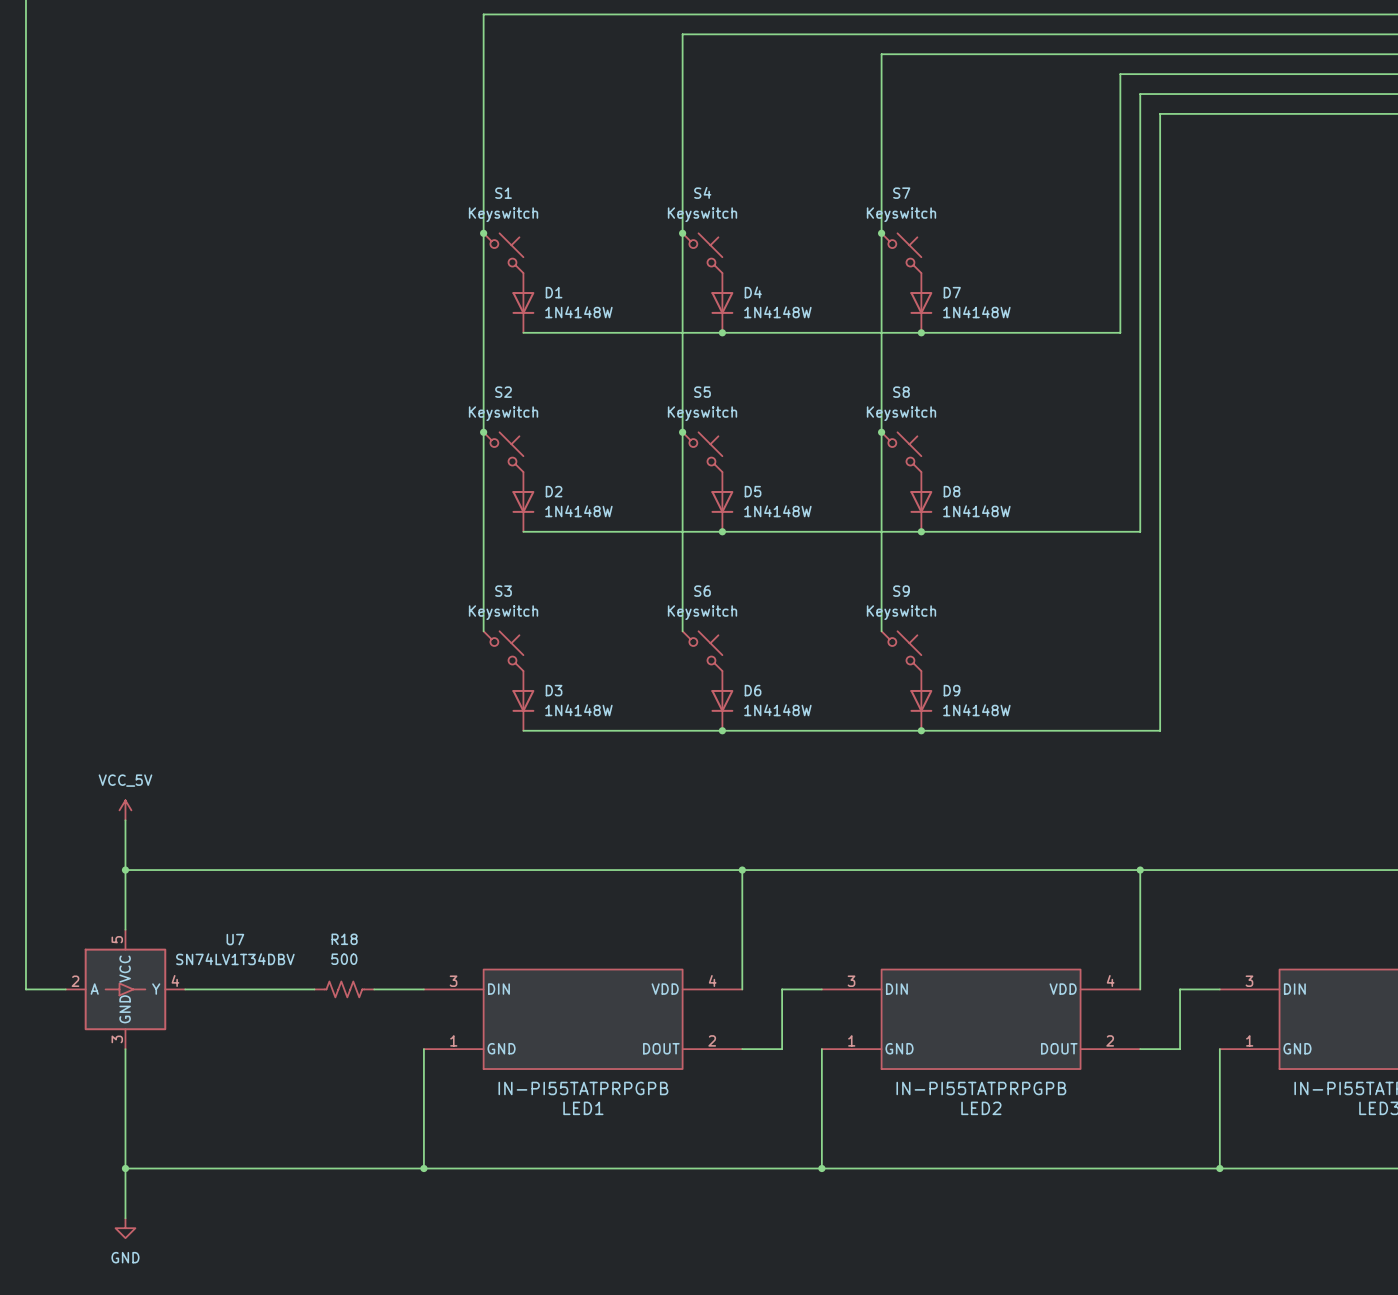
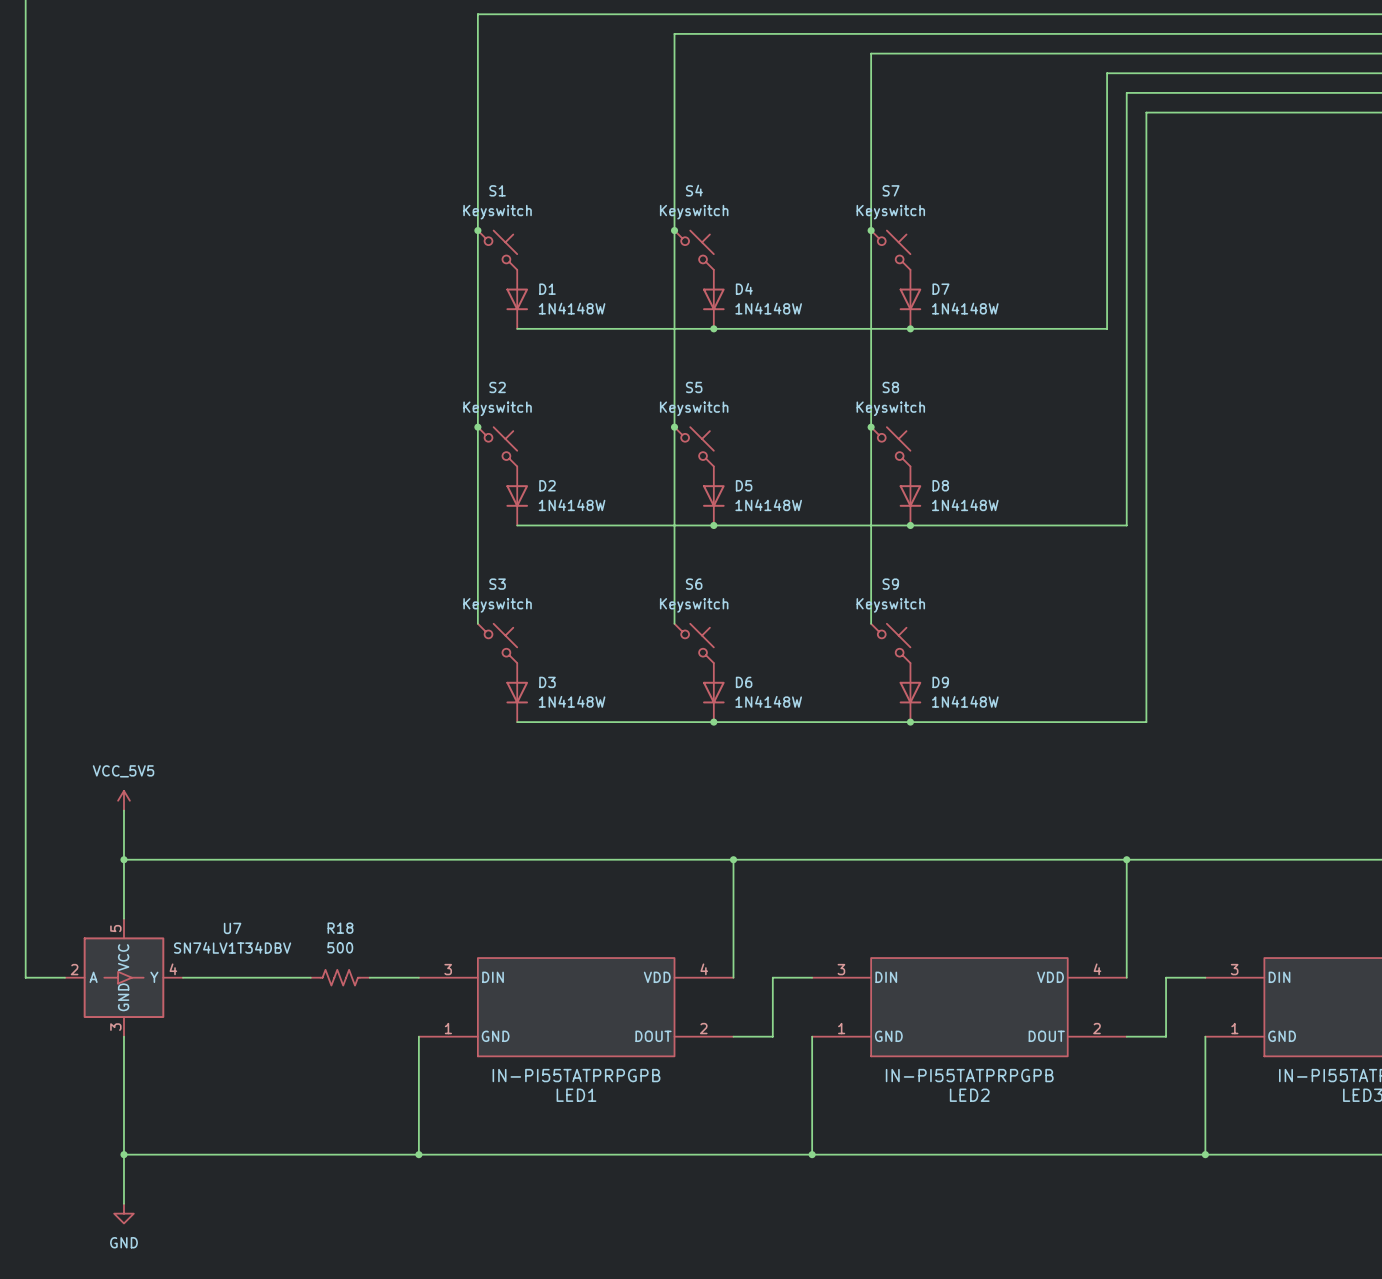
power symbol: VCC_5V (125, 810) -> VCC_5V5 (123, 800)

